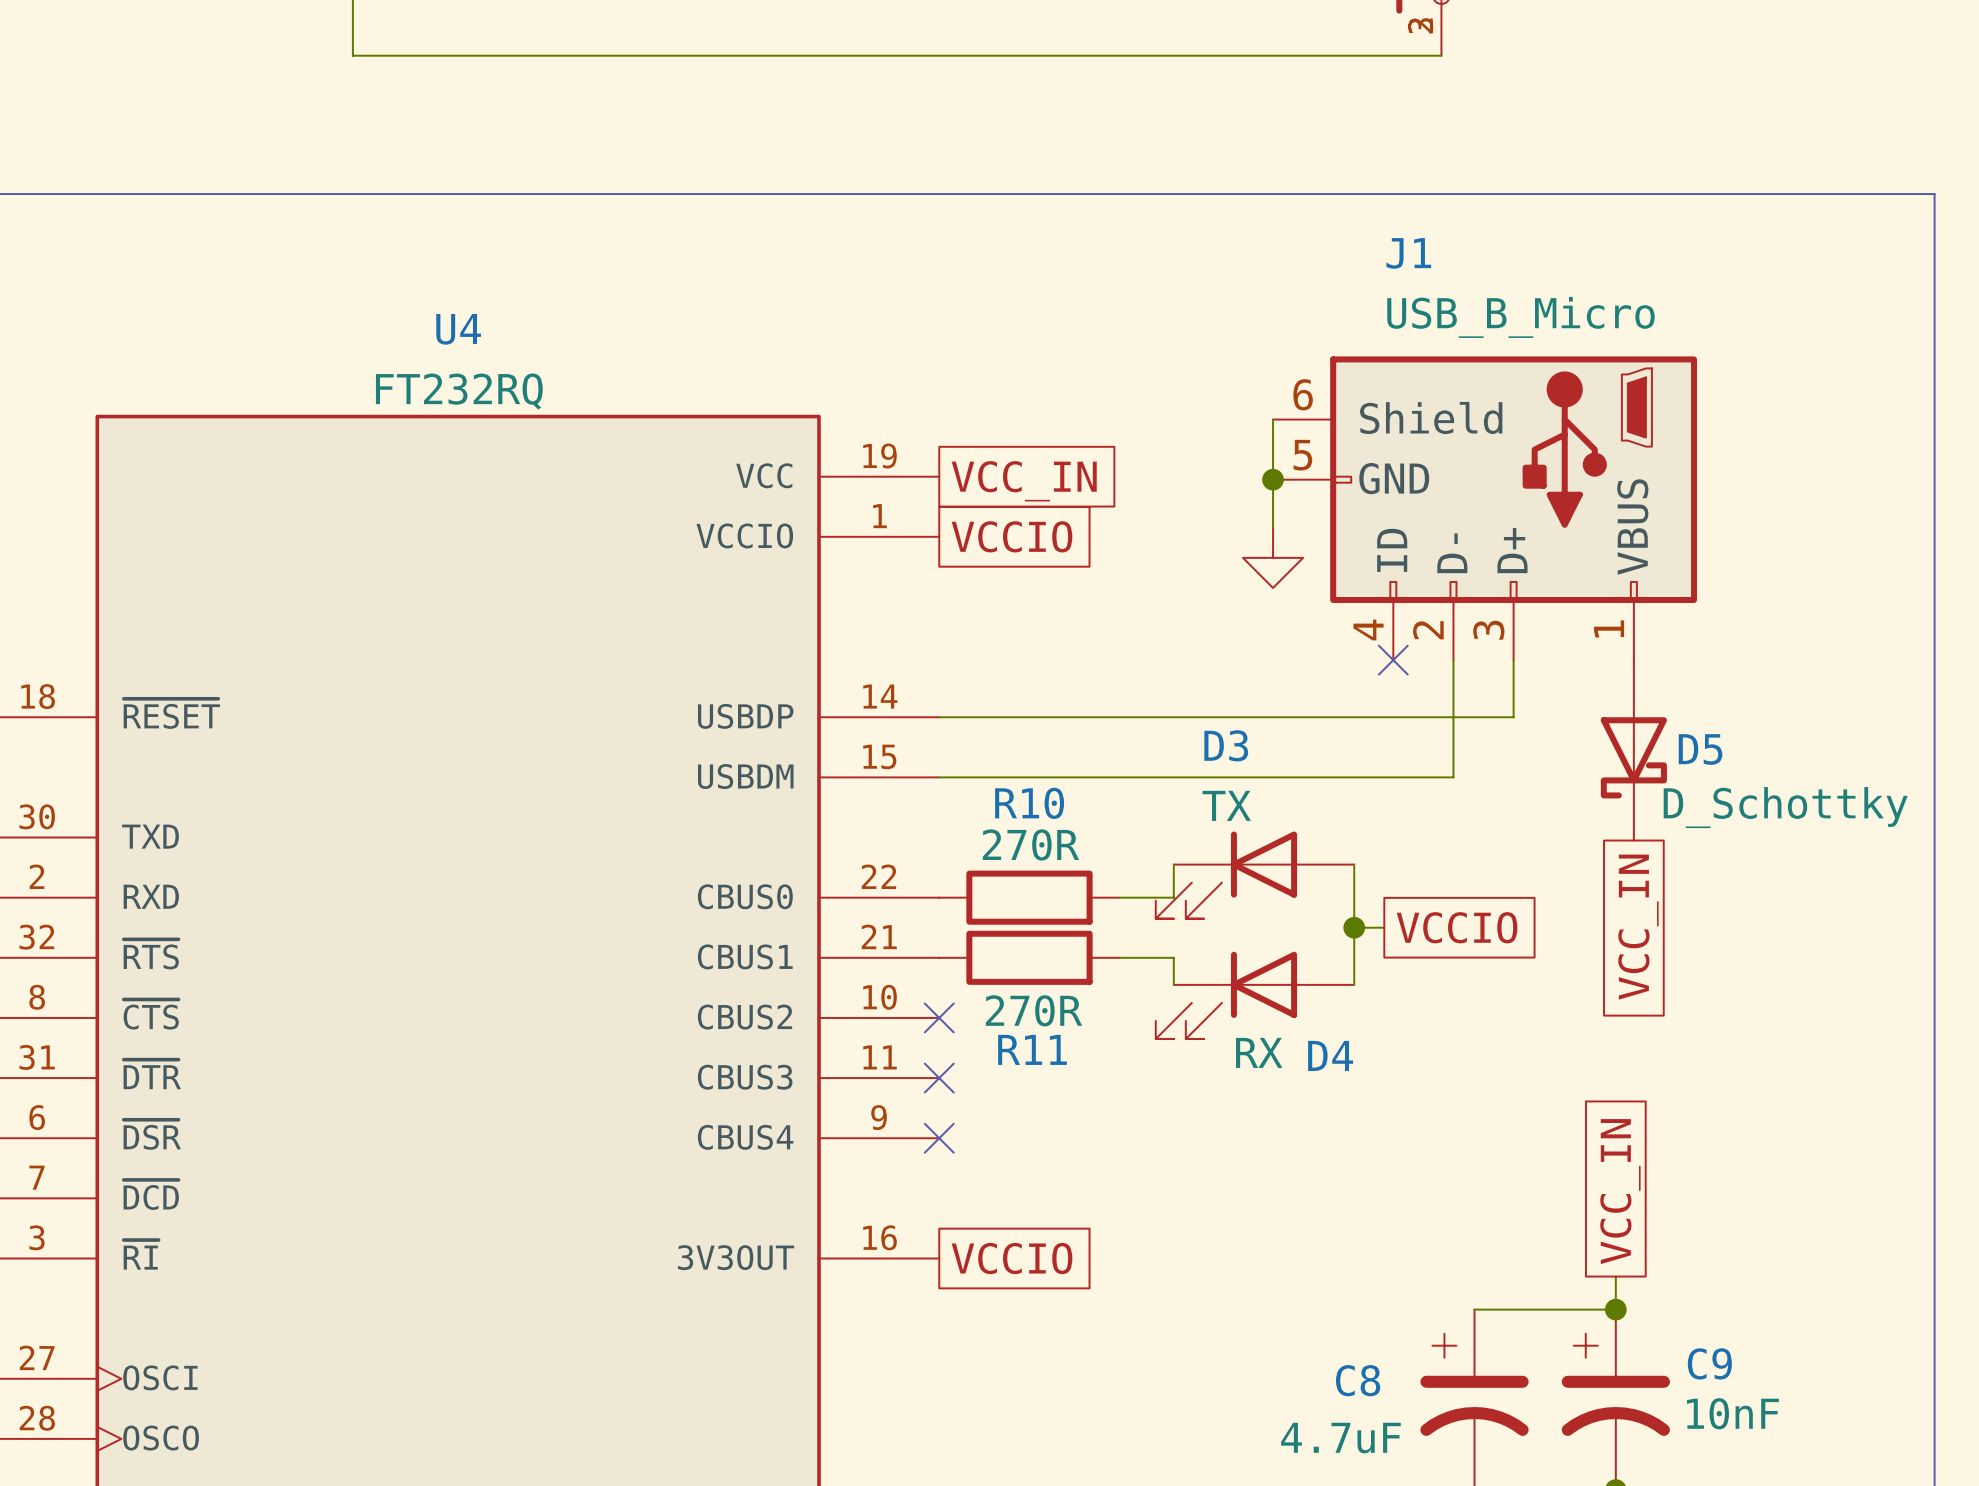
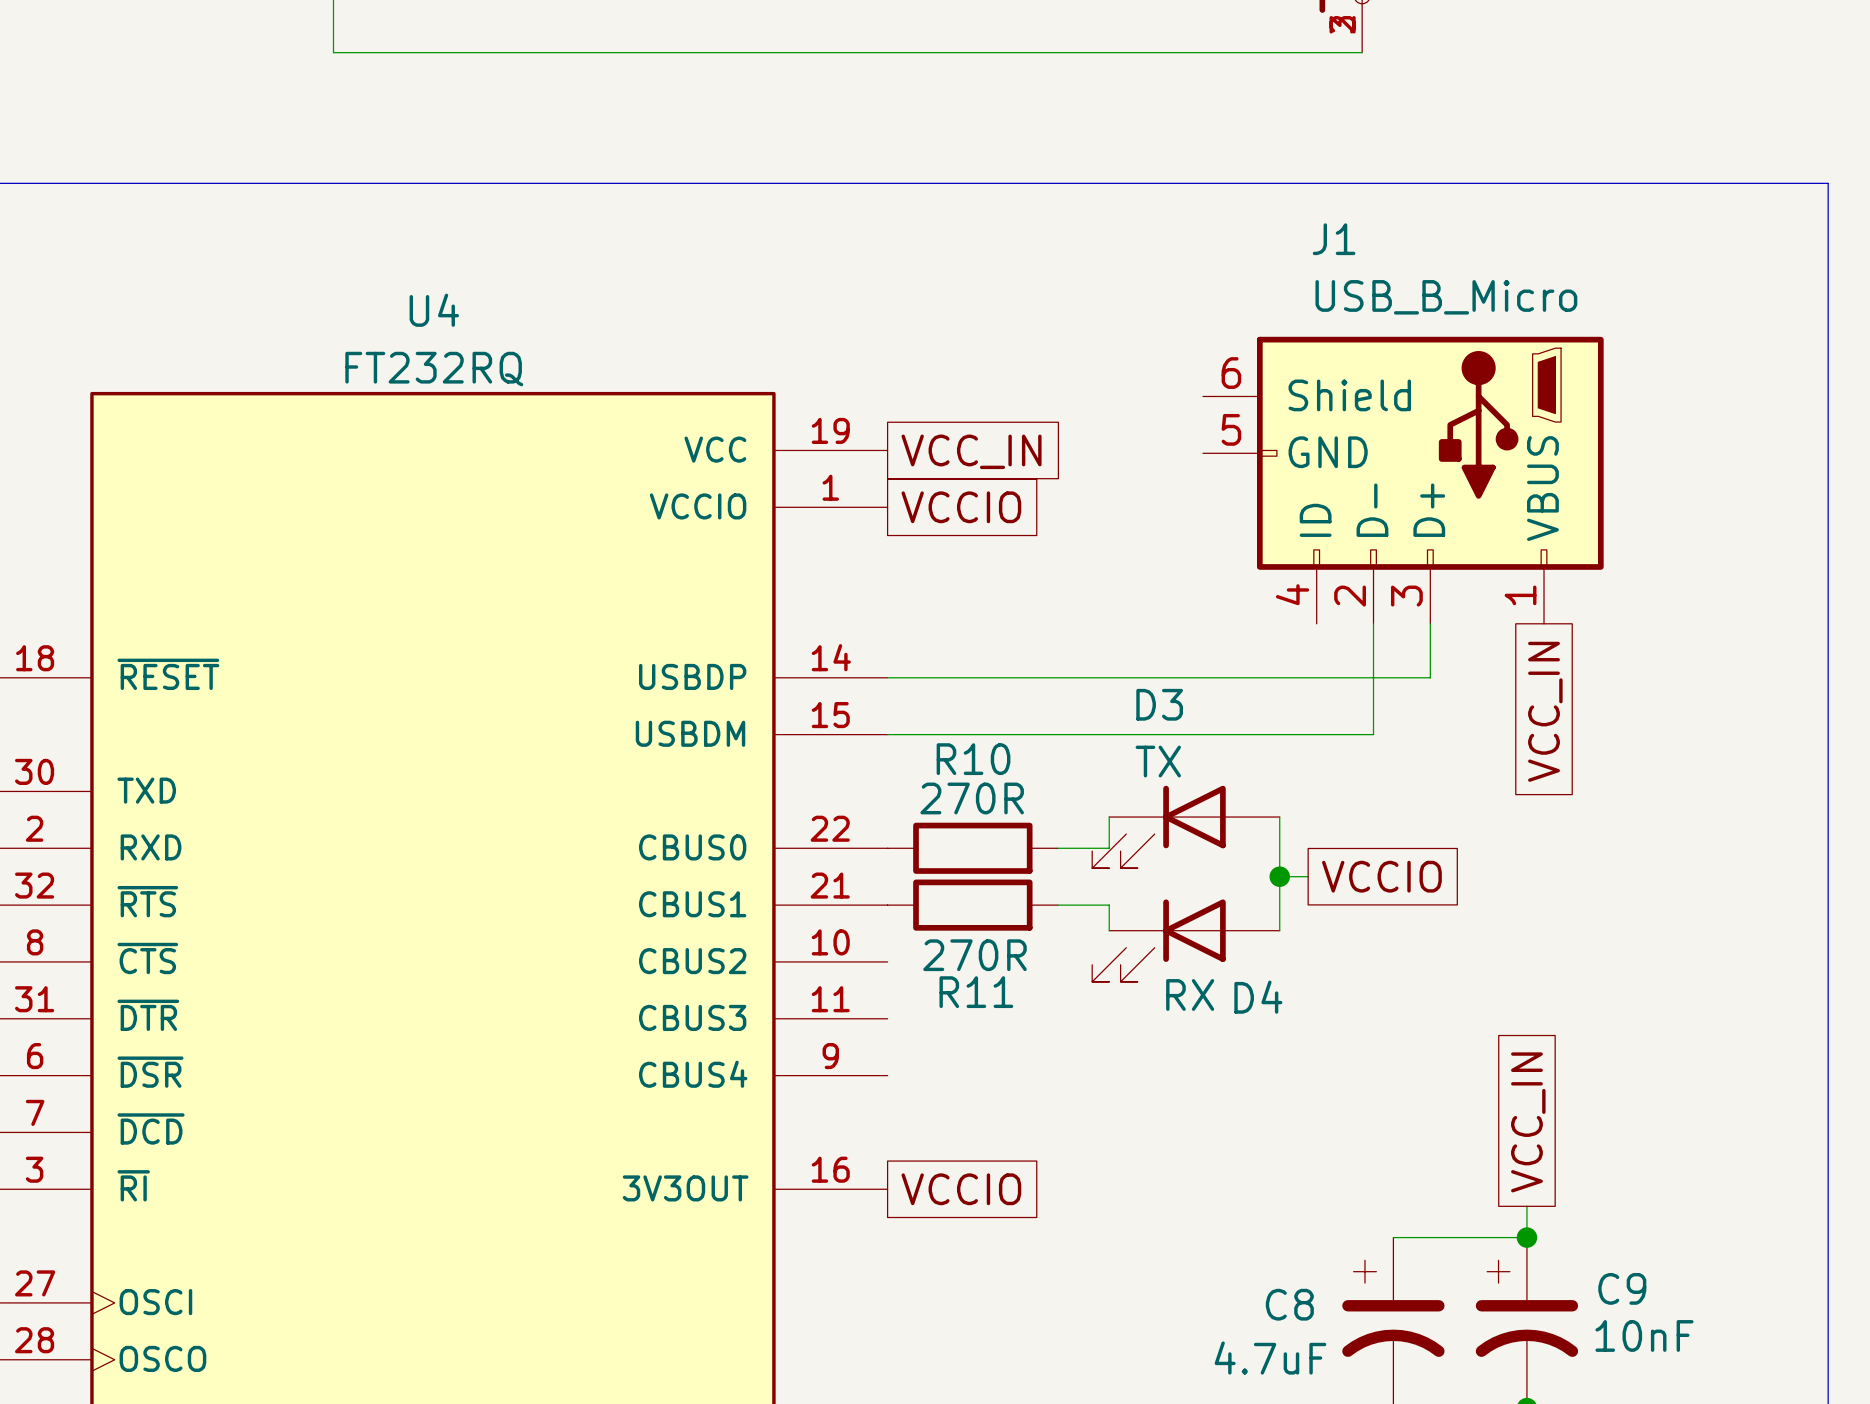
wire: (1273, 419) (1273, 527) -> none
junction: (1273, 479) -> none
power symbol: (1273, 557) -> none
no-connect mark: (1393, 660) -> none
D5: D_Schottky (1633, 750) -> none
global label position: VCC_IN (1638, 927) -> VCC_IN (1545, 711)
no-connect mark: (939, 1017) -> none
no-connect mark: (939, 1078) -> none
no-connect mark: (939, 1138) -> none

